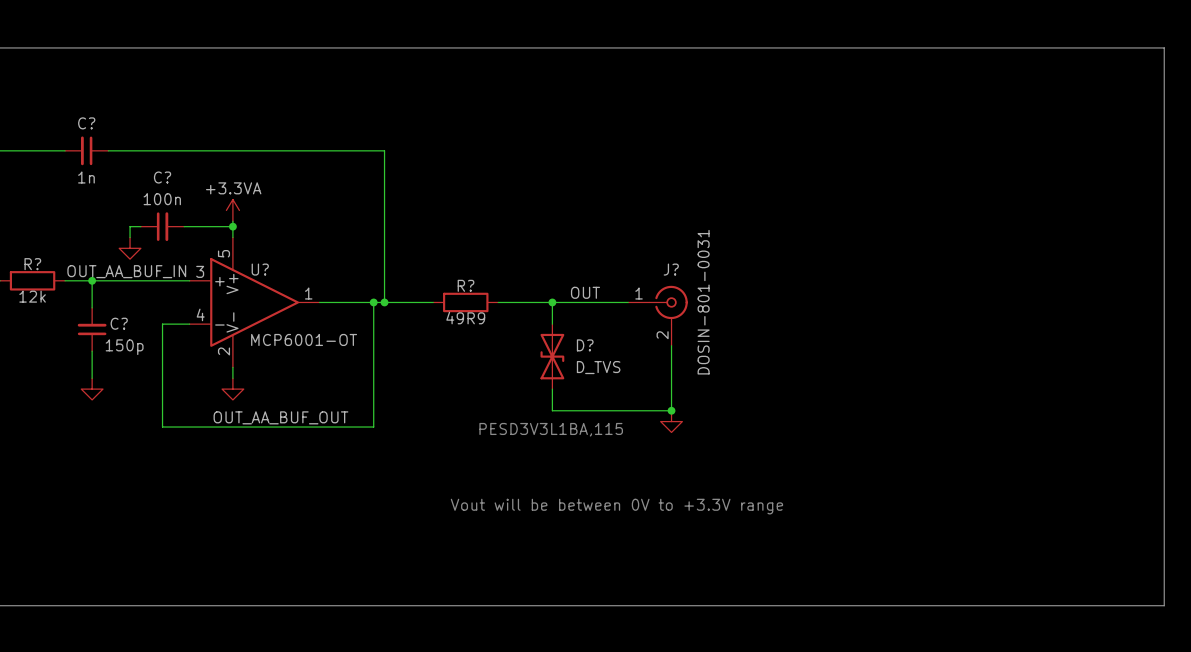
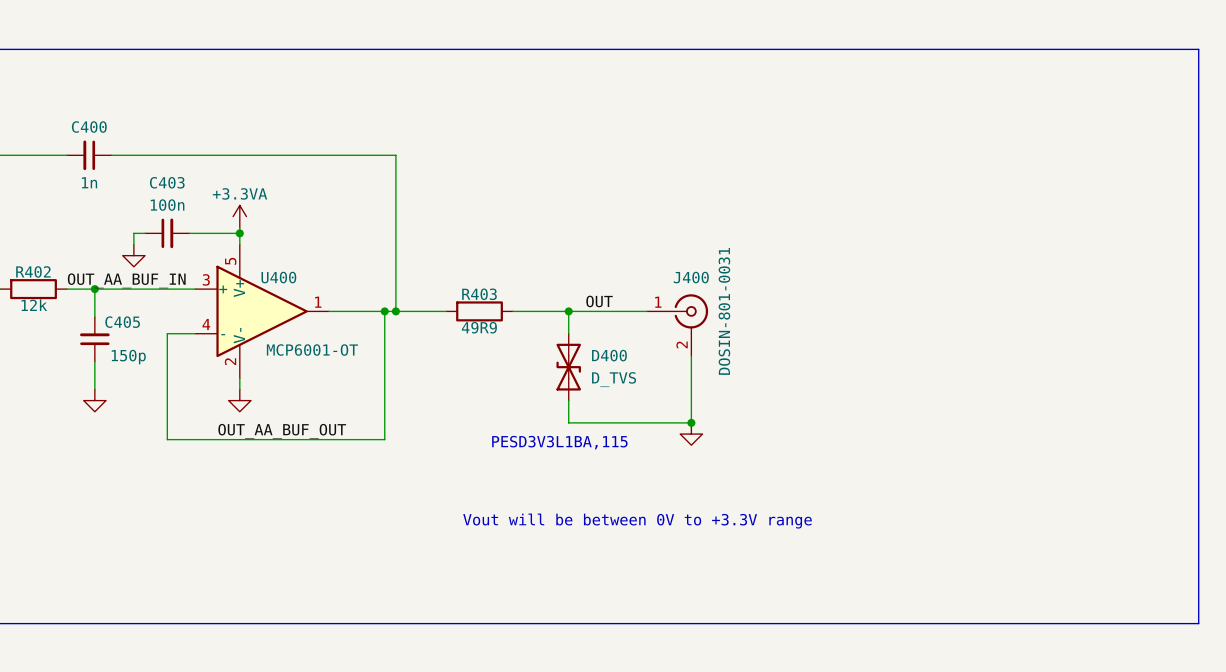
C? name: C? (86, 123) -> C400 (89, 127)
C? name: C? (162, 177) -> C403 (167, 182)
R? name: R? (32, 264) -> R402 (33, 271)
U? name: U? (260, 269) -> U400 (278, 277)
J? name: J? (671, 269) -> J400 (691, 277)
R? name: R? (466, 285) -> R403 (479, 294)
C? name: C? (119, 323) -> C405 (122, 322)
D? name: D? (585, 345) -> D400 (609, 355)

